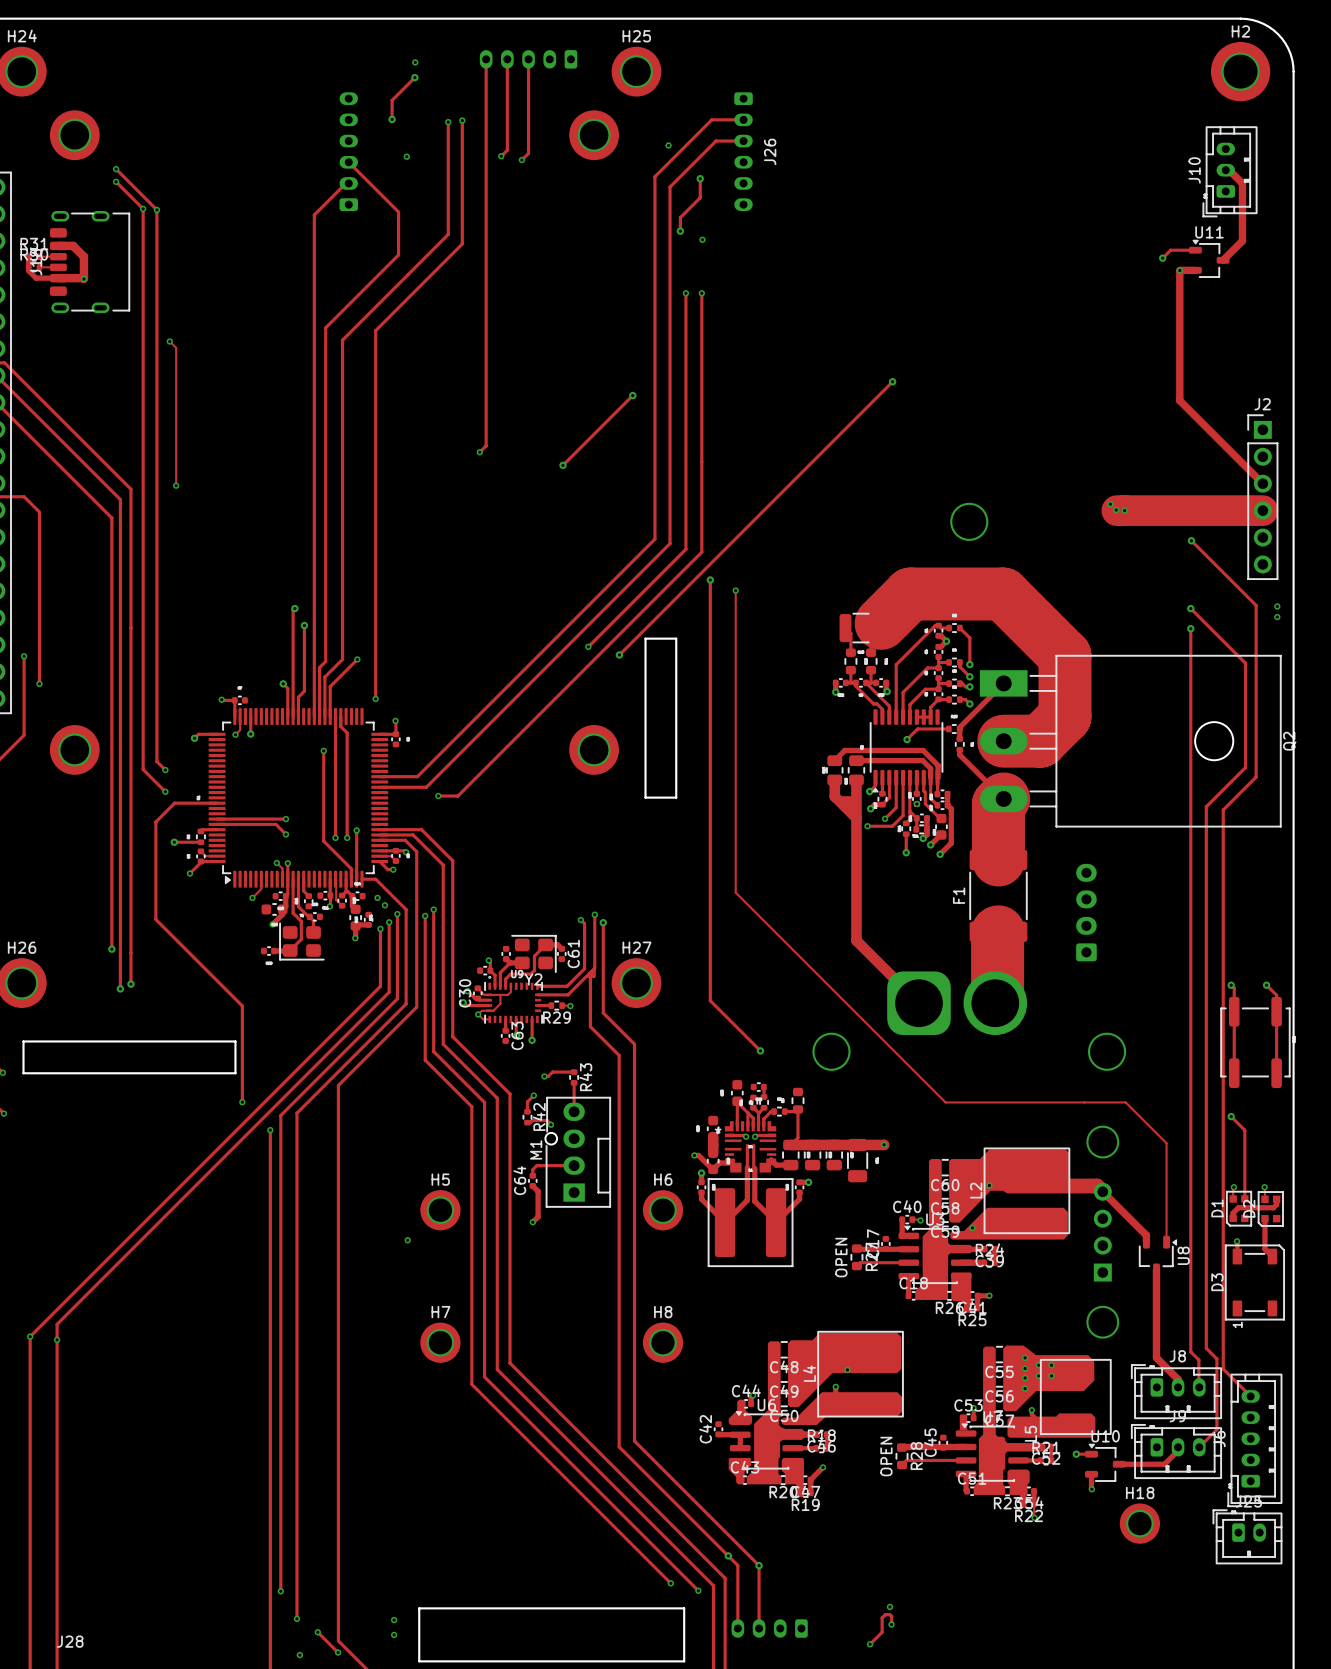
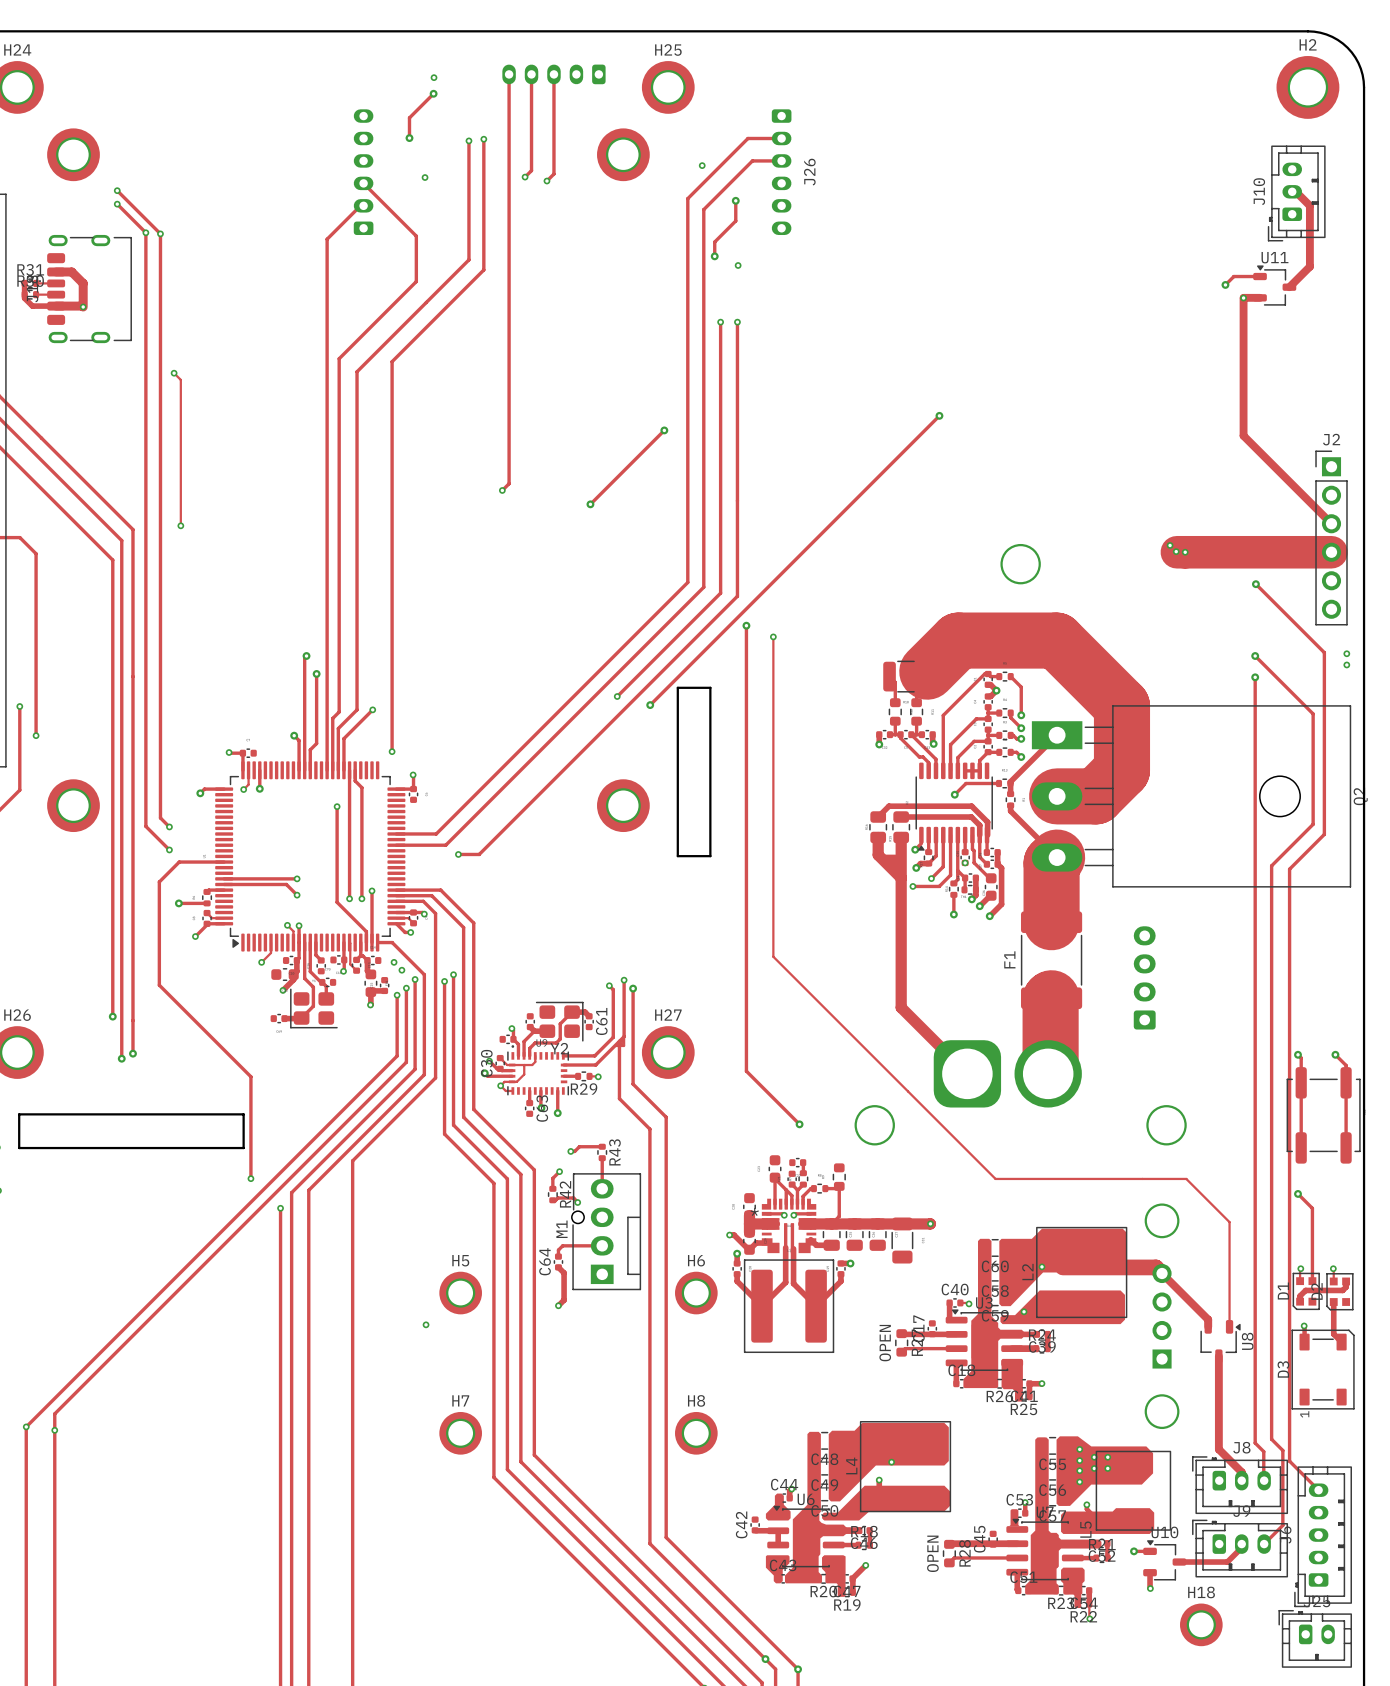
track: none -> (749, 1223) (774, 1223)
track: none -> (803, 1223) (831, 1223)

